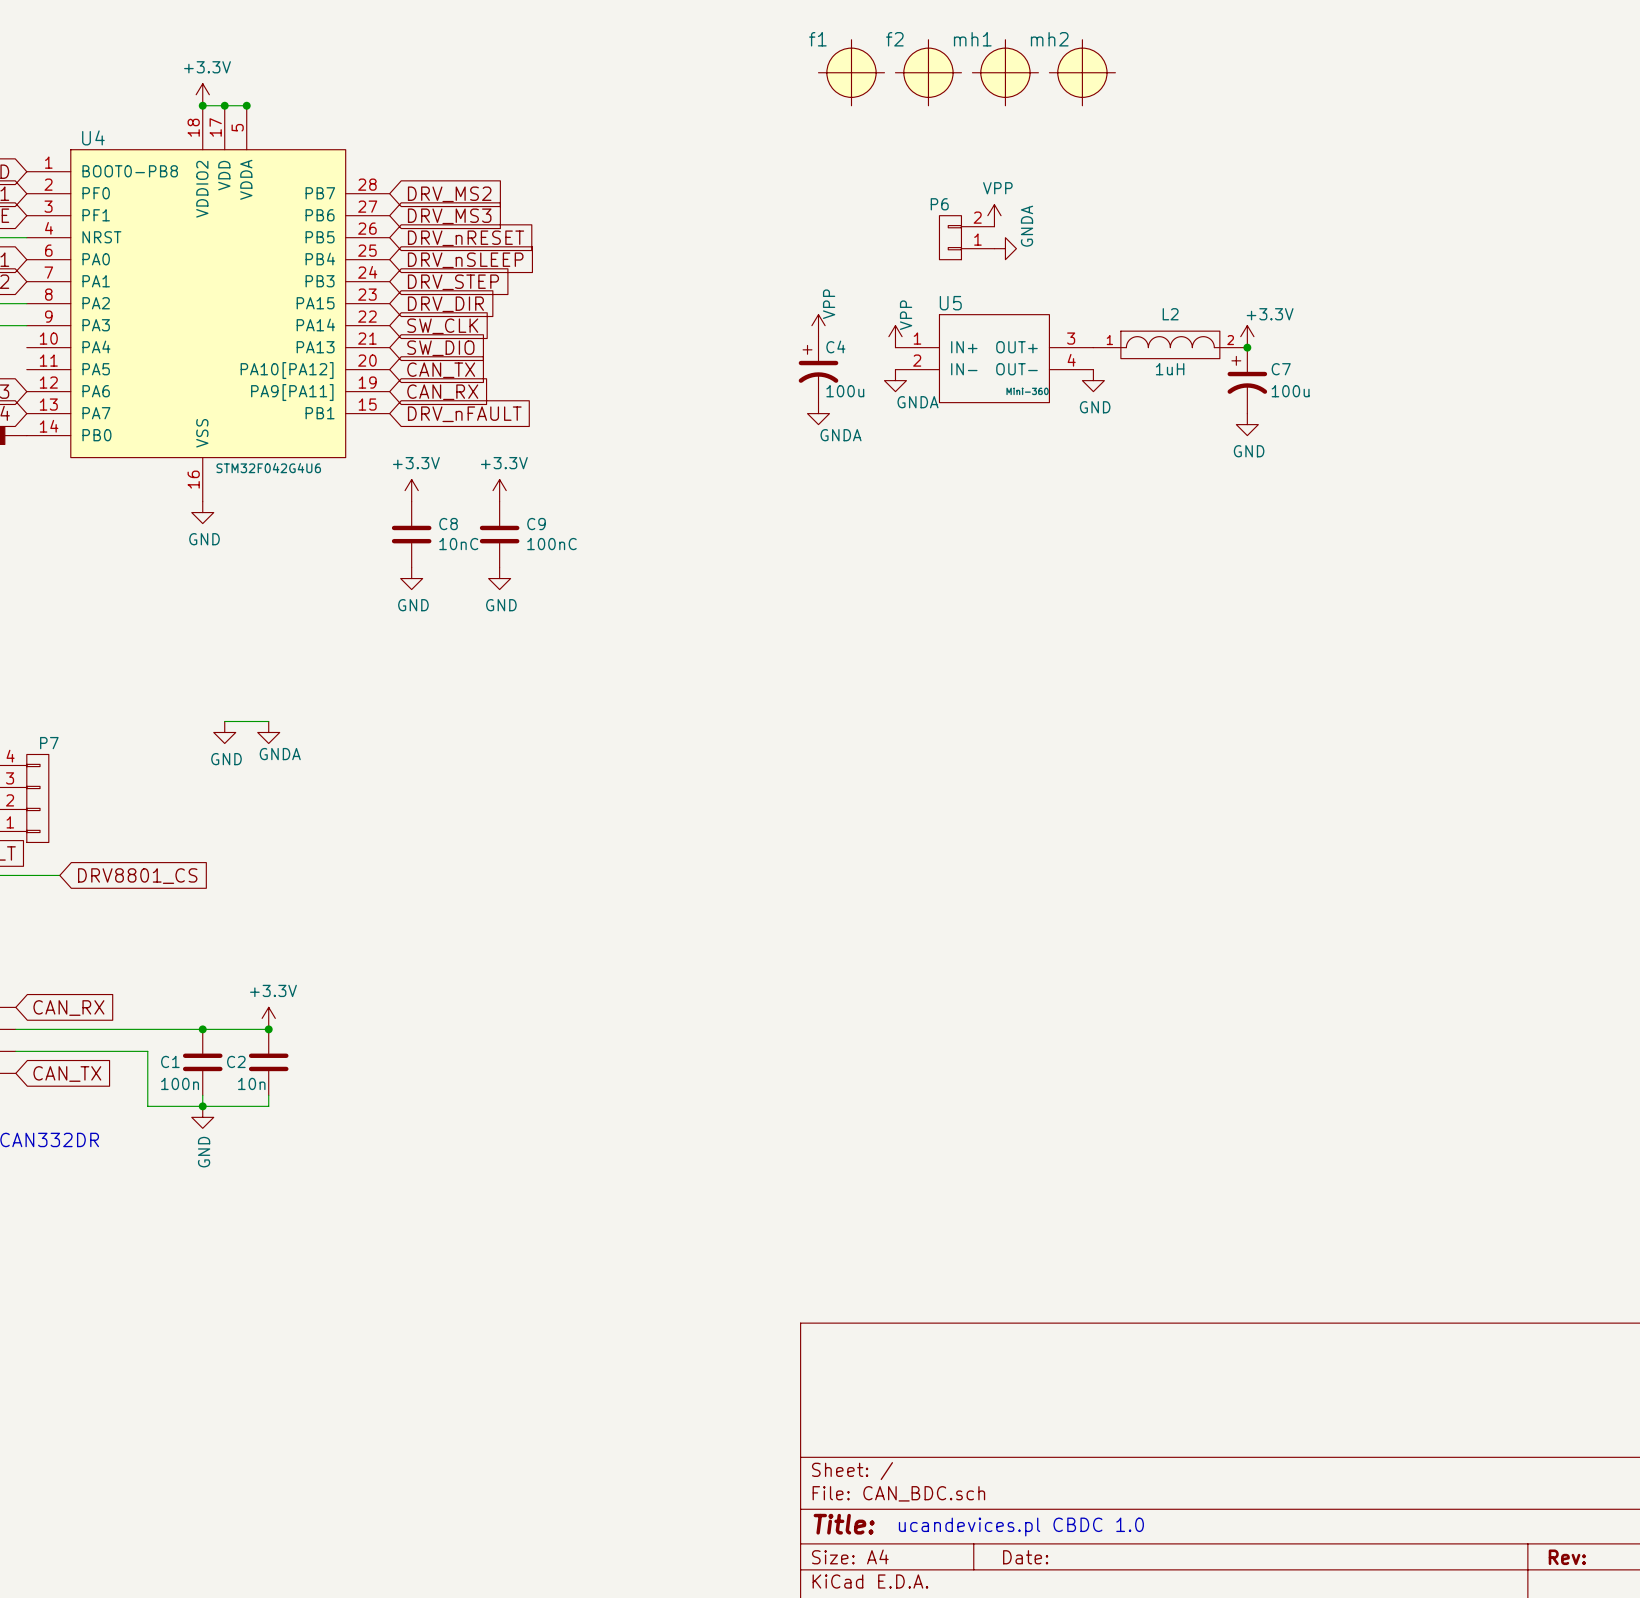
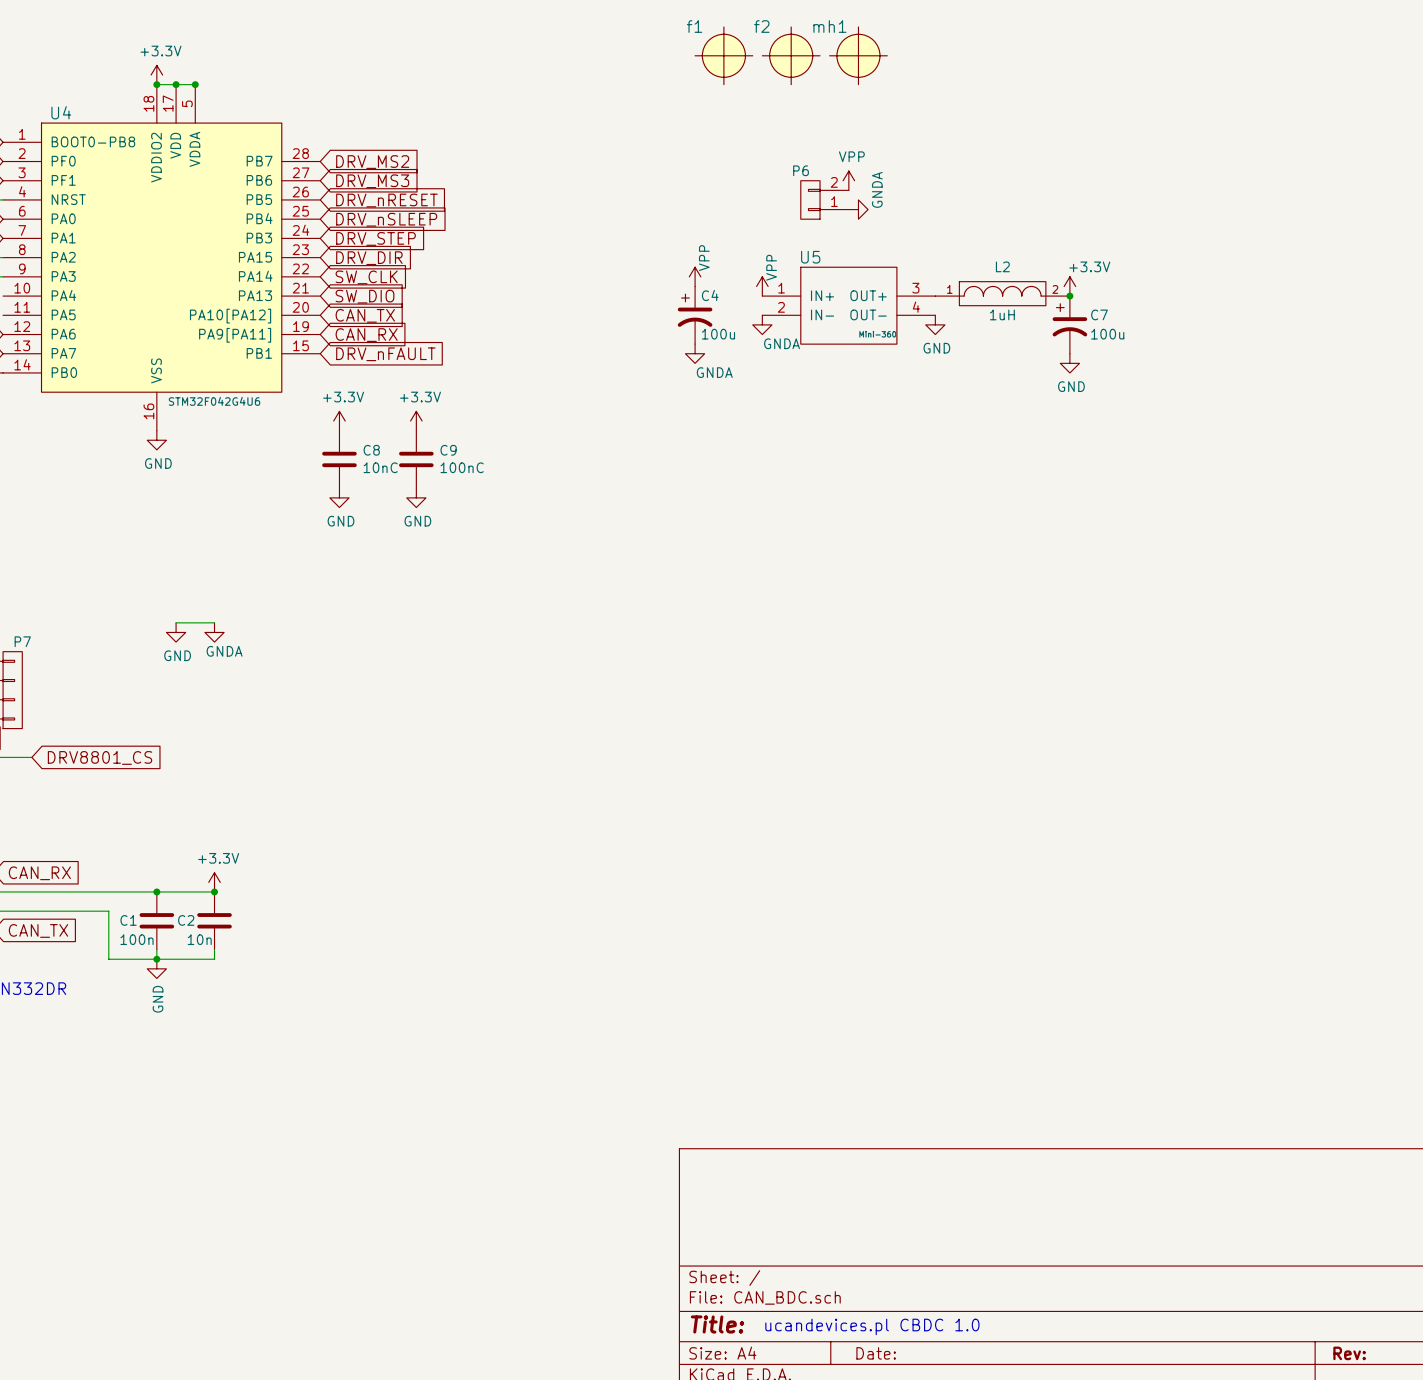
mh2: (1082, 72) -> none

